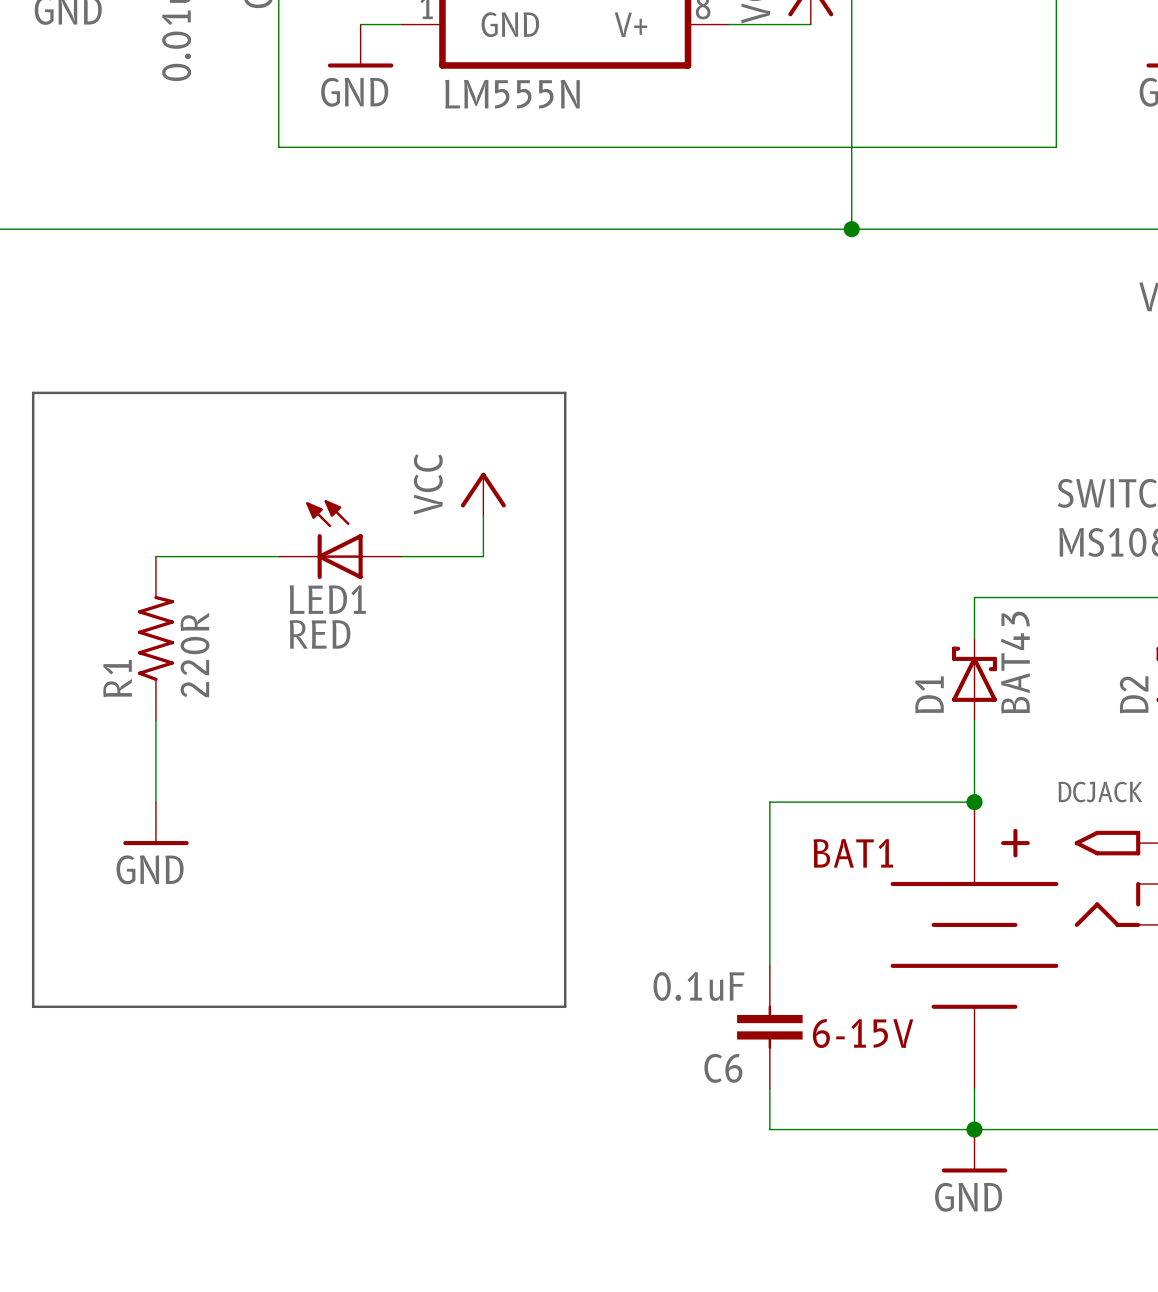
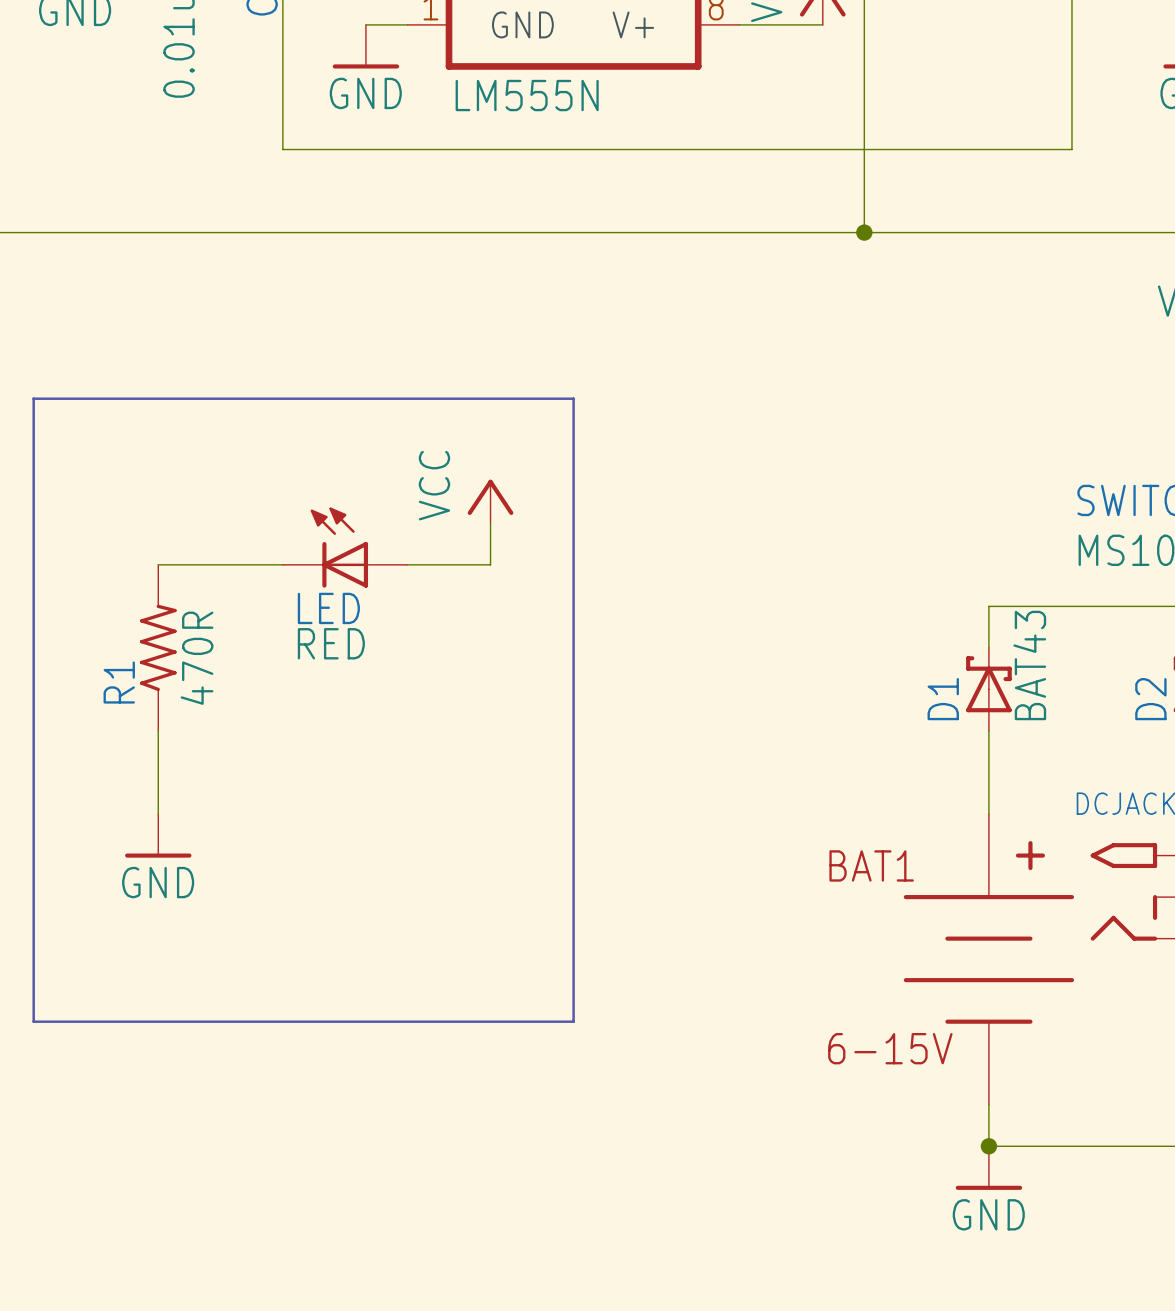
LED1 name: LED1 (327, 599) -> LED (328, 608)
R1 value: 220R (195, 655) -> 470R (197, 658)
wire: (974, 802) (769, 802) (769, 965) -> none
junction: (974, 802) -> none
C6: 0.1uF (769, 1027) -> none
wire: (769, 1088) (769, 1129) (974, 1129) -> none

